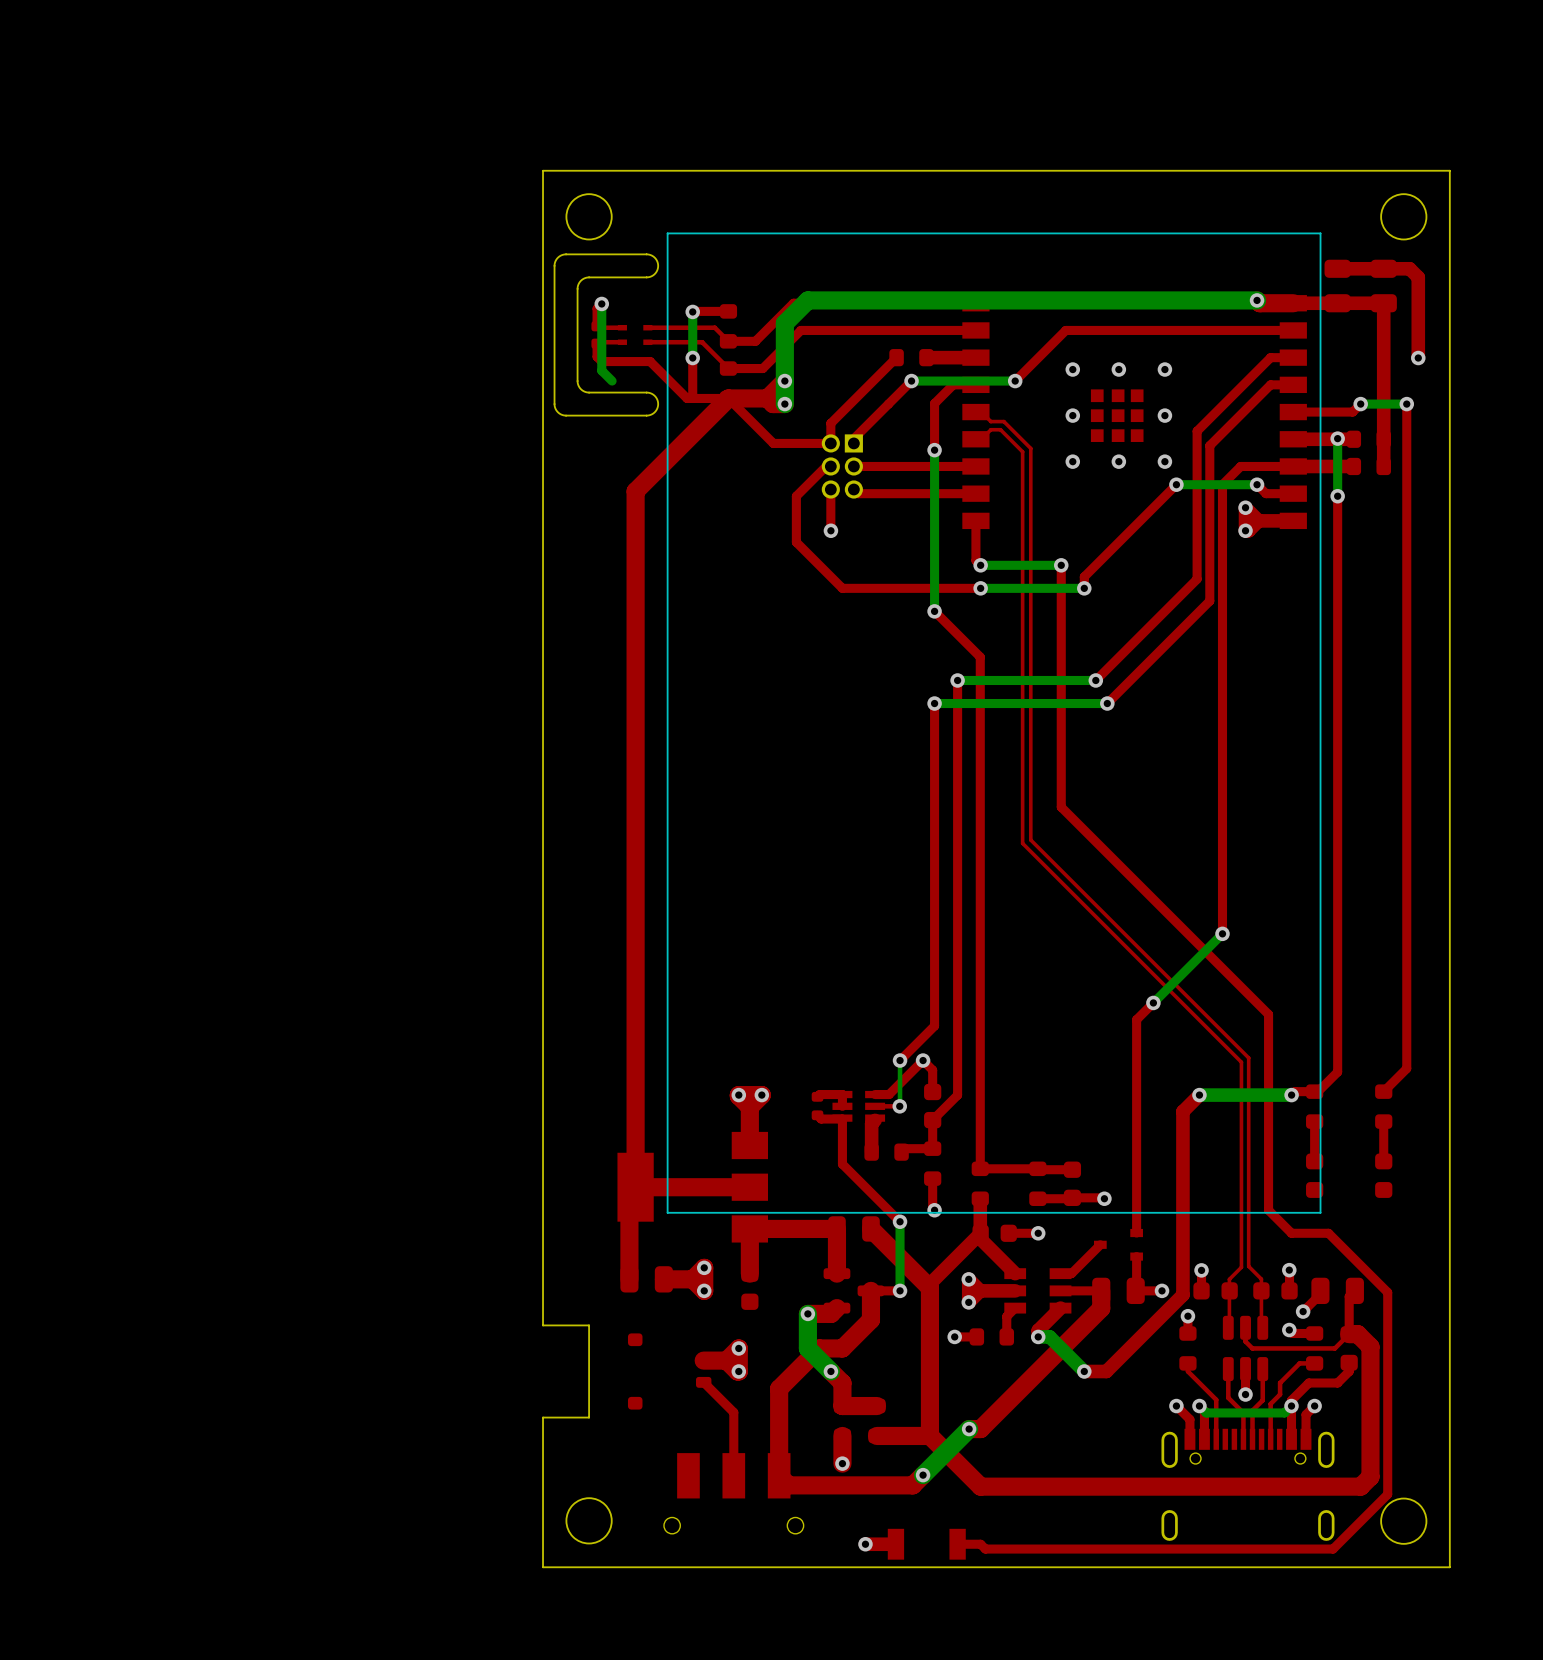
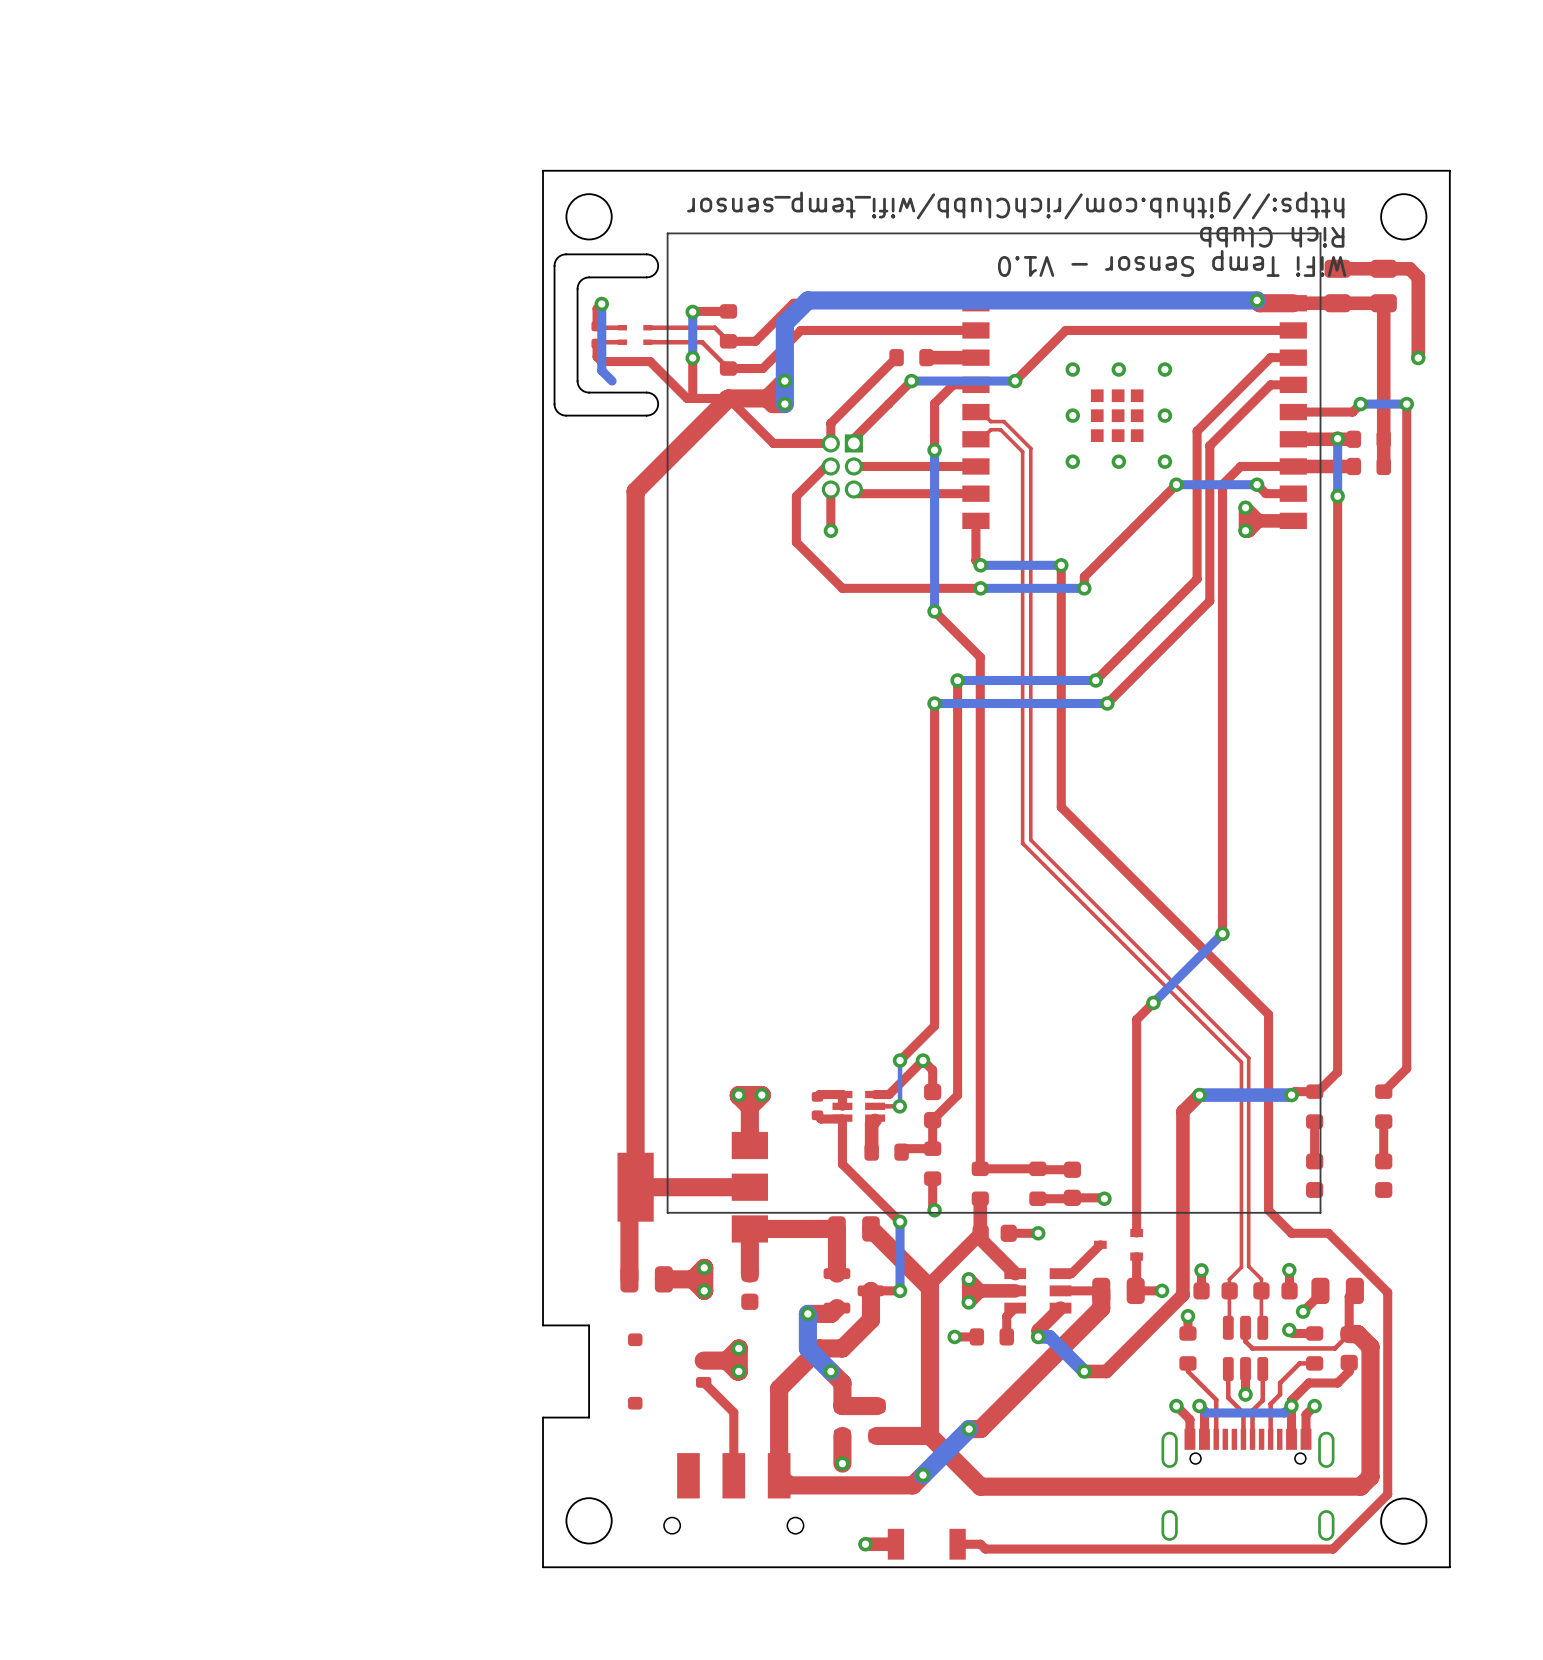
text: none -> https://github.com/richClubb/wifi_temp_sensor (1015, 205)
text: none -> Rich Clubb (1272, 237)
text: none -> WiFi Temp Sensor - V1.0 (1172, 263)

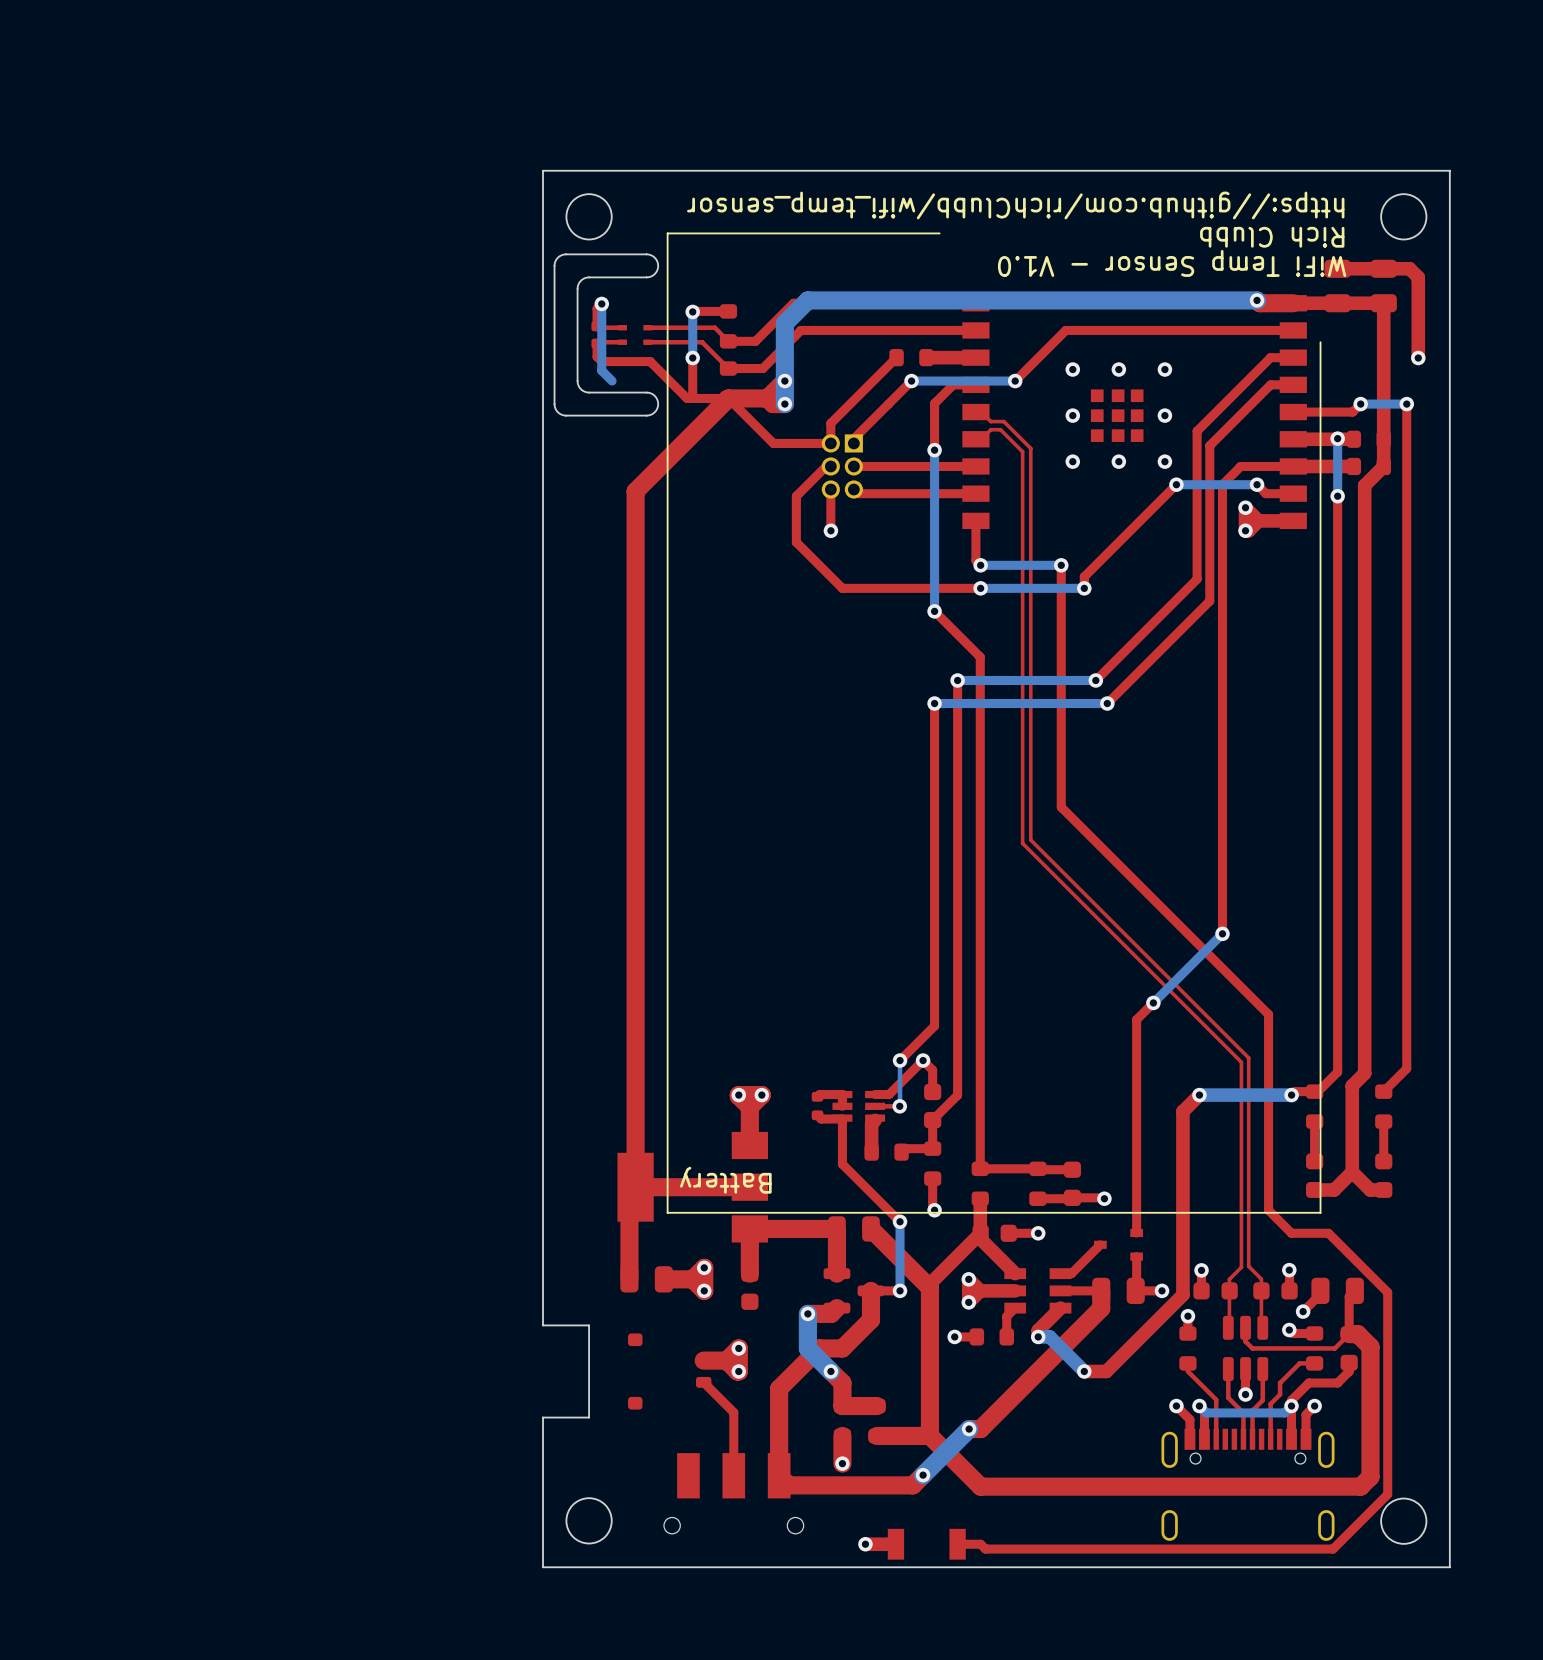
line: (939, 233) (1320, 233) (1320, 342) -> none
top track: none -> (1383, 466) (1364, 485) (1364, 1073) (1352, 1085) (1352, 1171)
top track: none -> (1352, 1171) (1334, 1189) (1314, 1189)
top track: none -> (1352, 1171) (1370, 1189) (1383, 1189)
text: none -> Battery (725, 1180)

